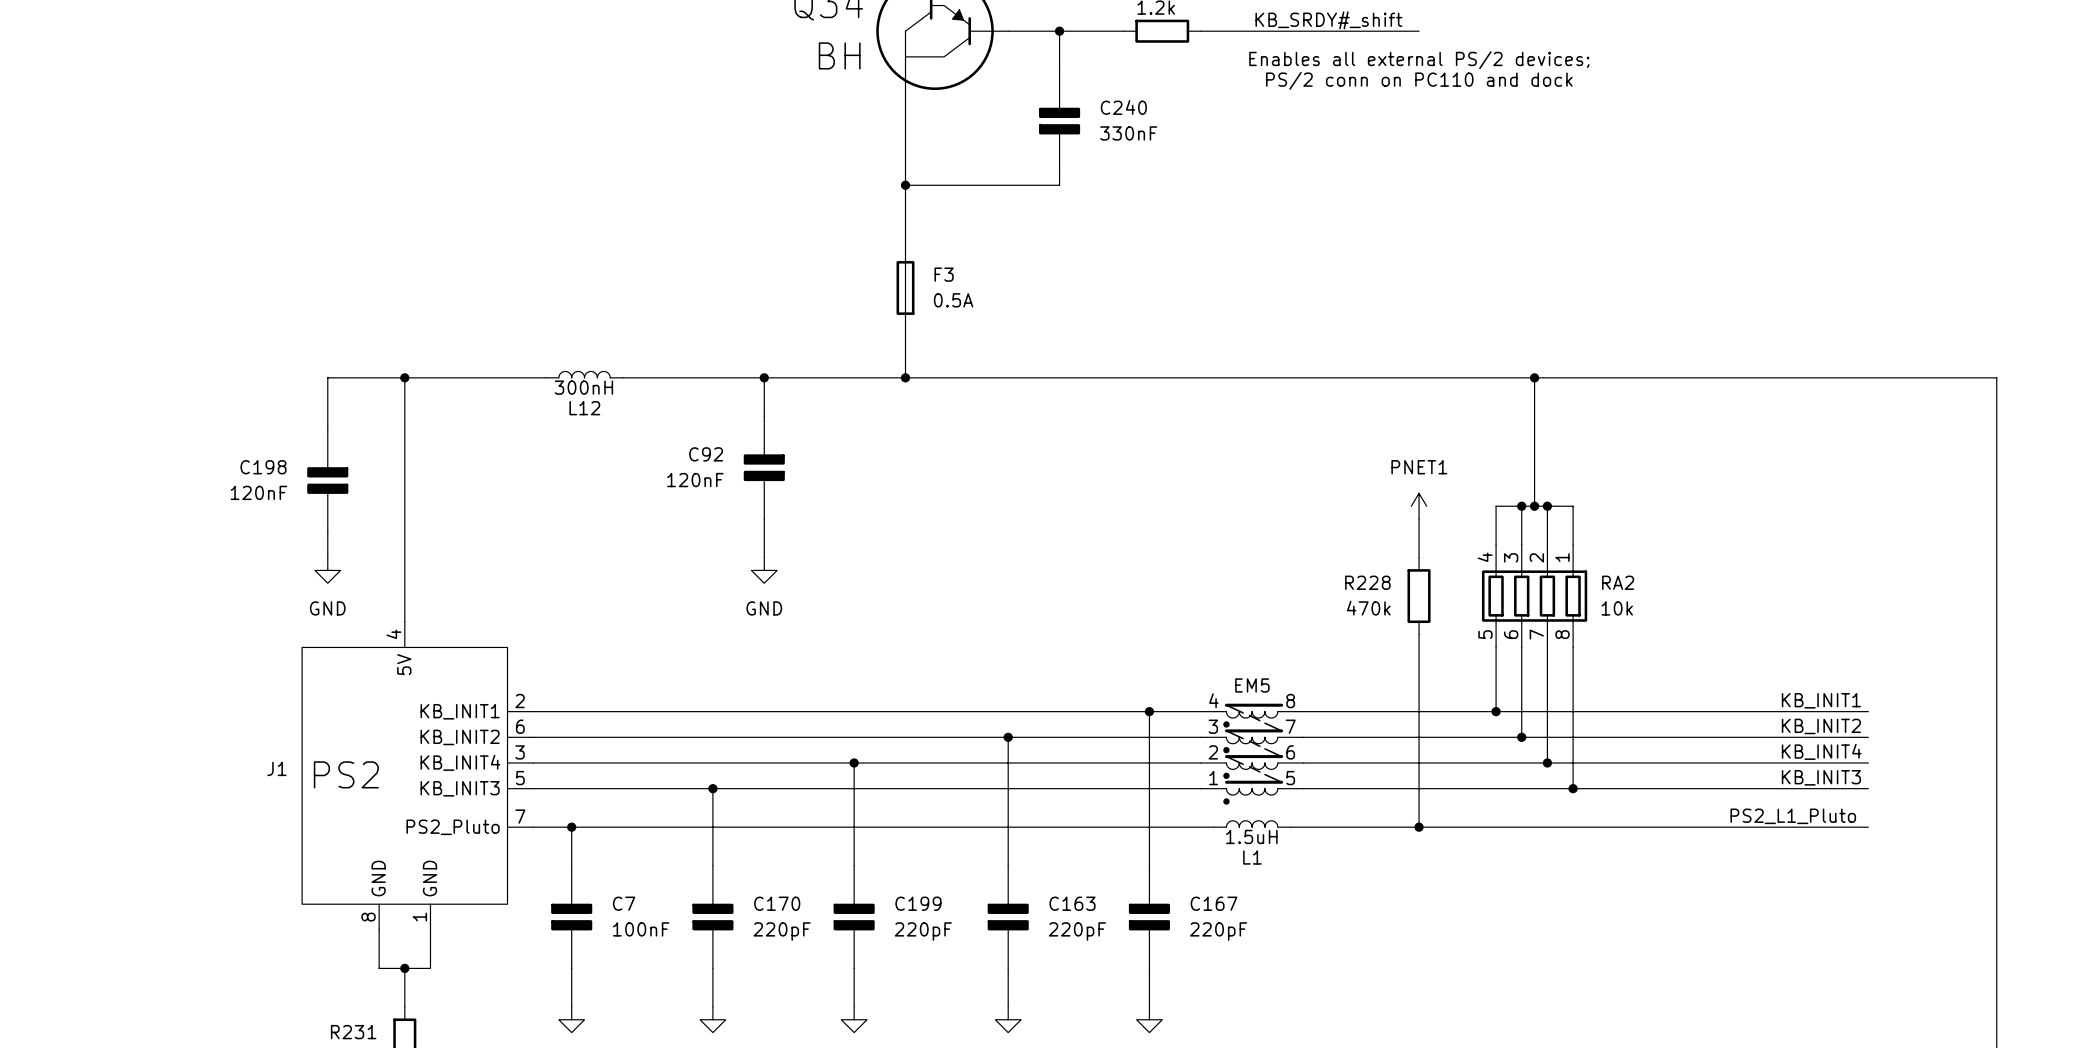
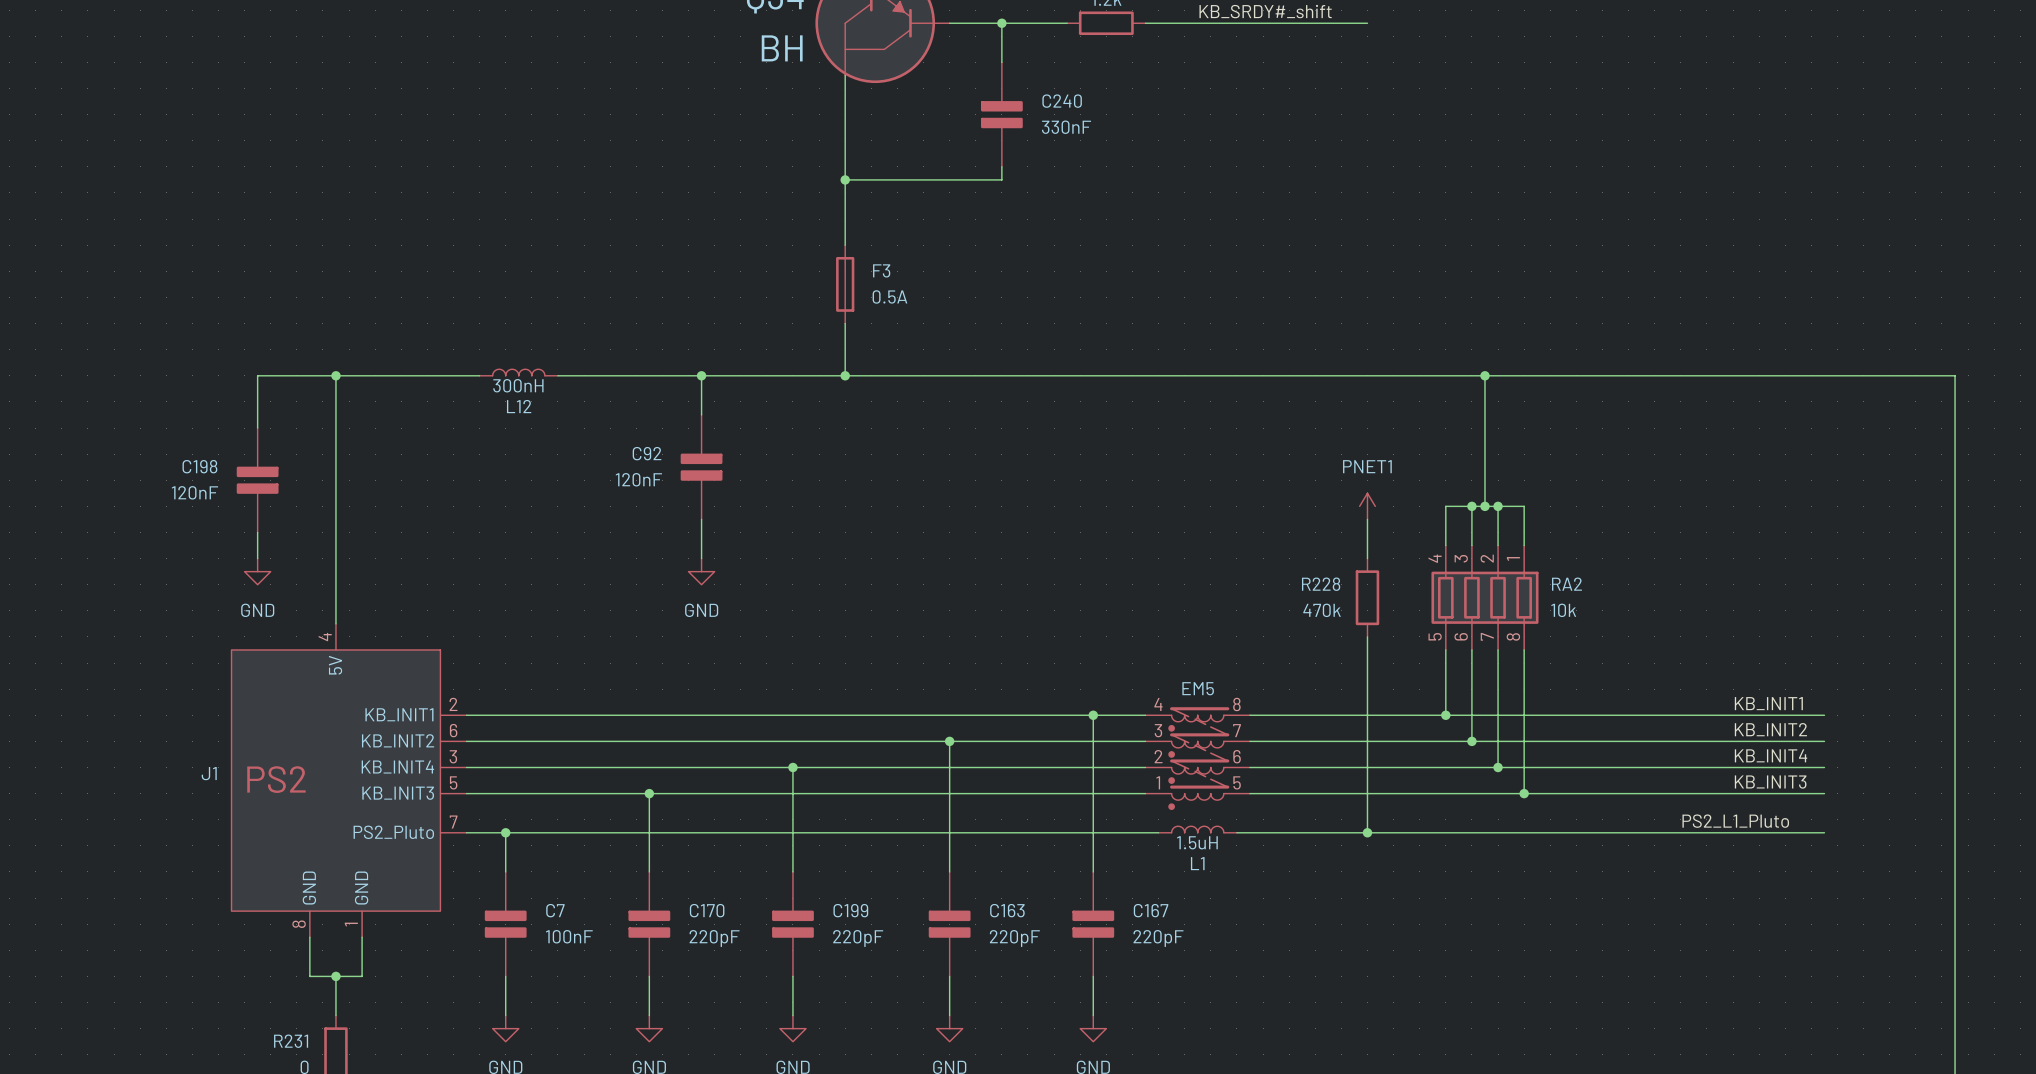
text: Enables all external PS/2 devices; (1419, 60) -> none
text: PS/2 conn on PC110 and dock (1419, 80) -> none

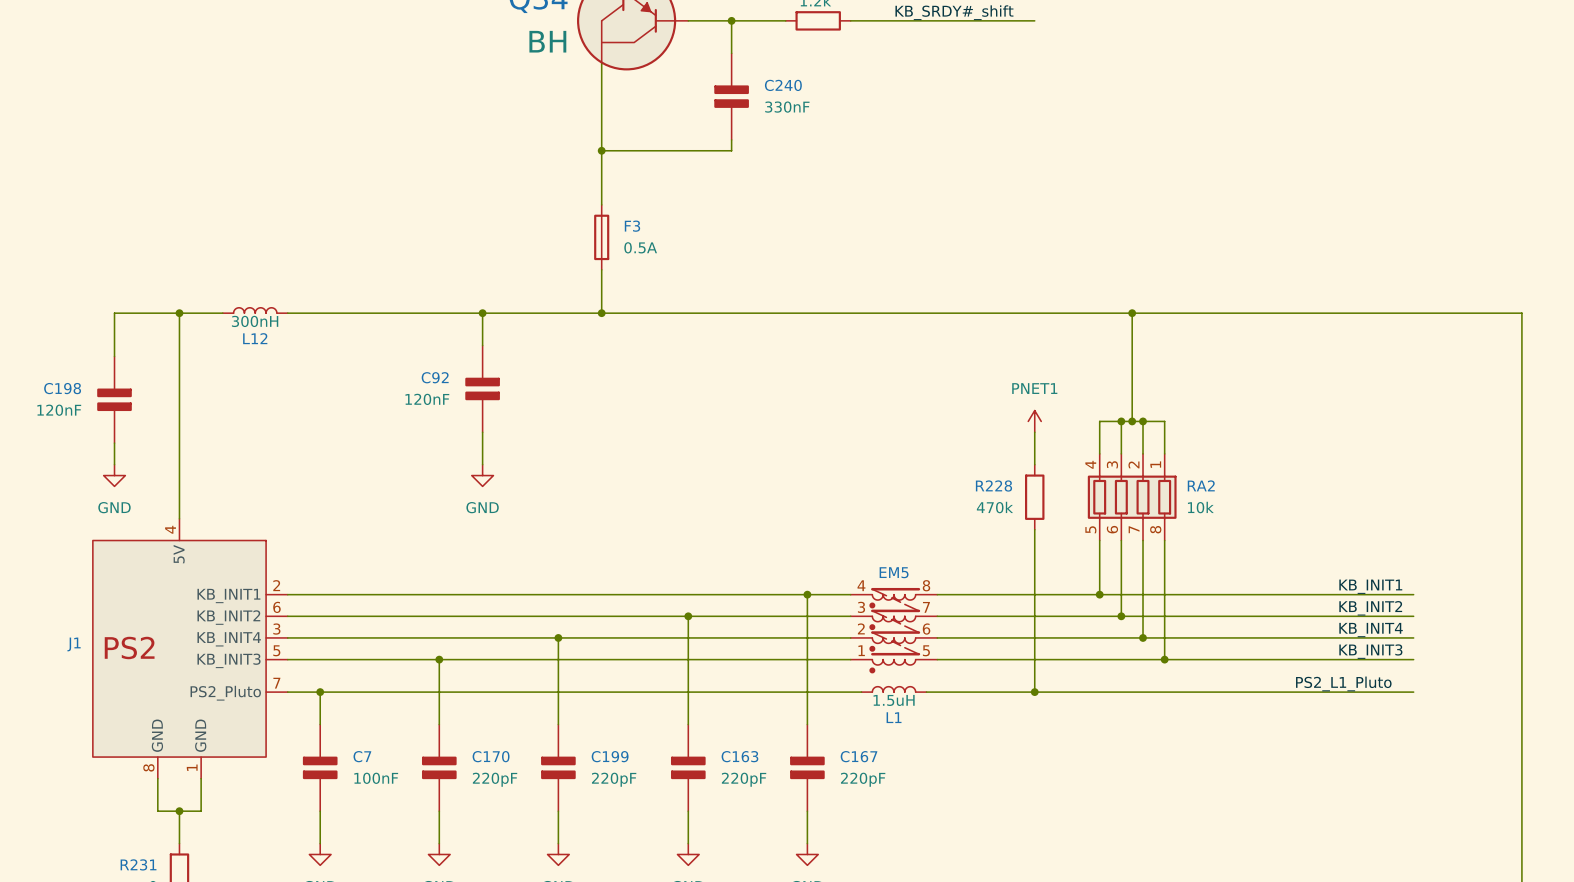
L12 position: (518, 372) -> (255, 310)
wire: (388, 375) (466, 375) -> (298, 313) (363, 313)

